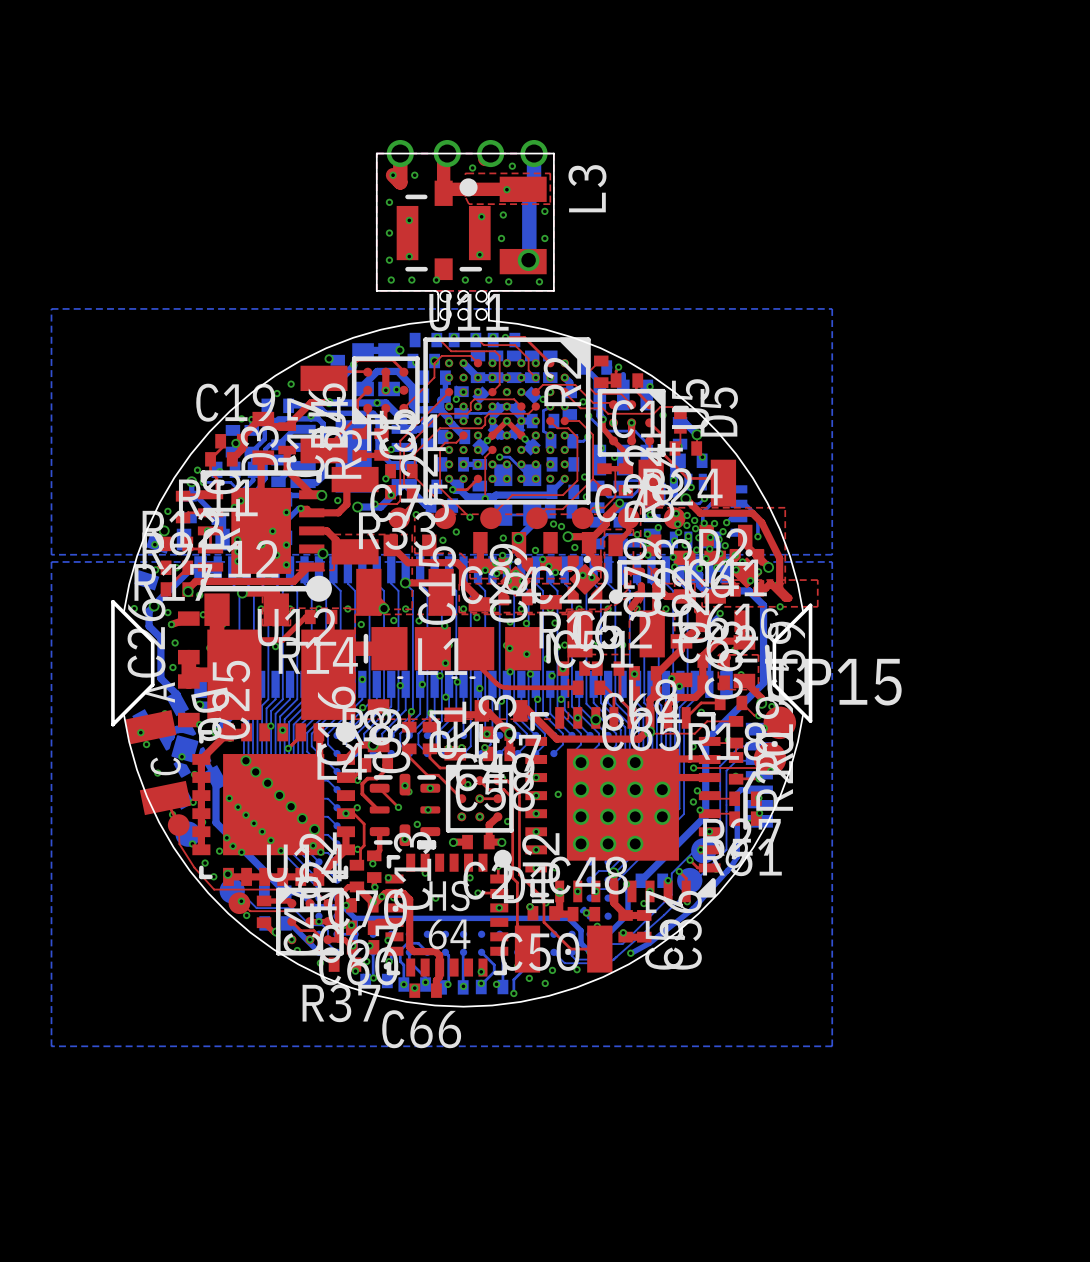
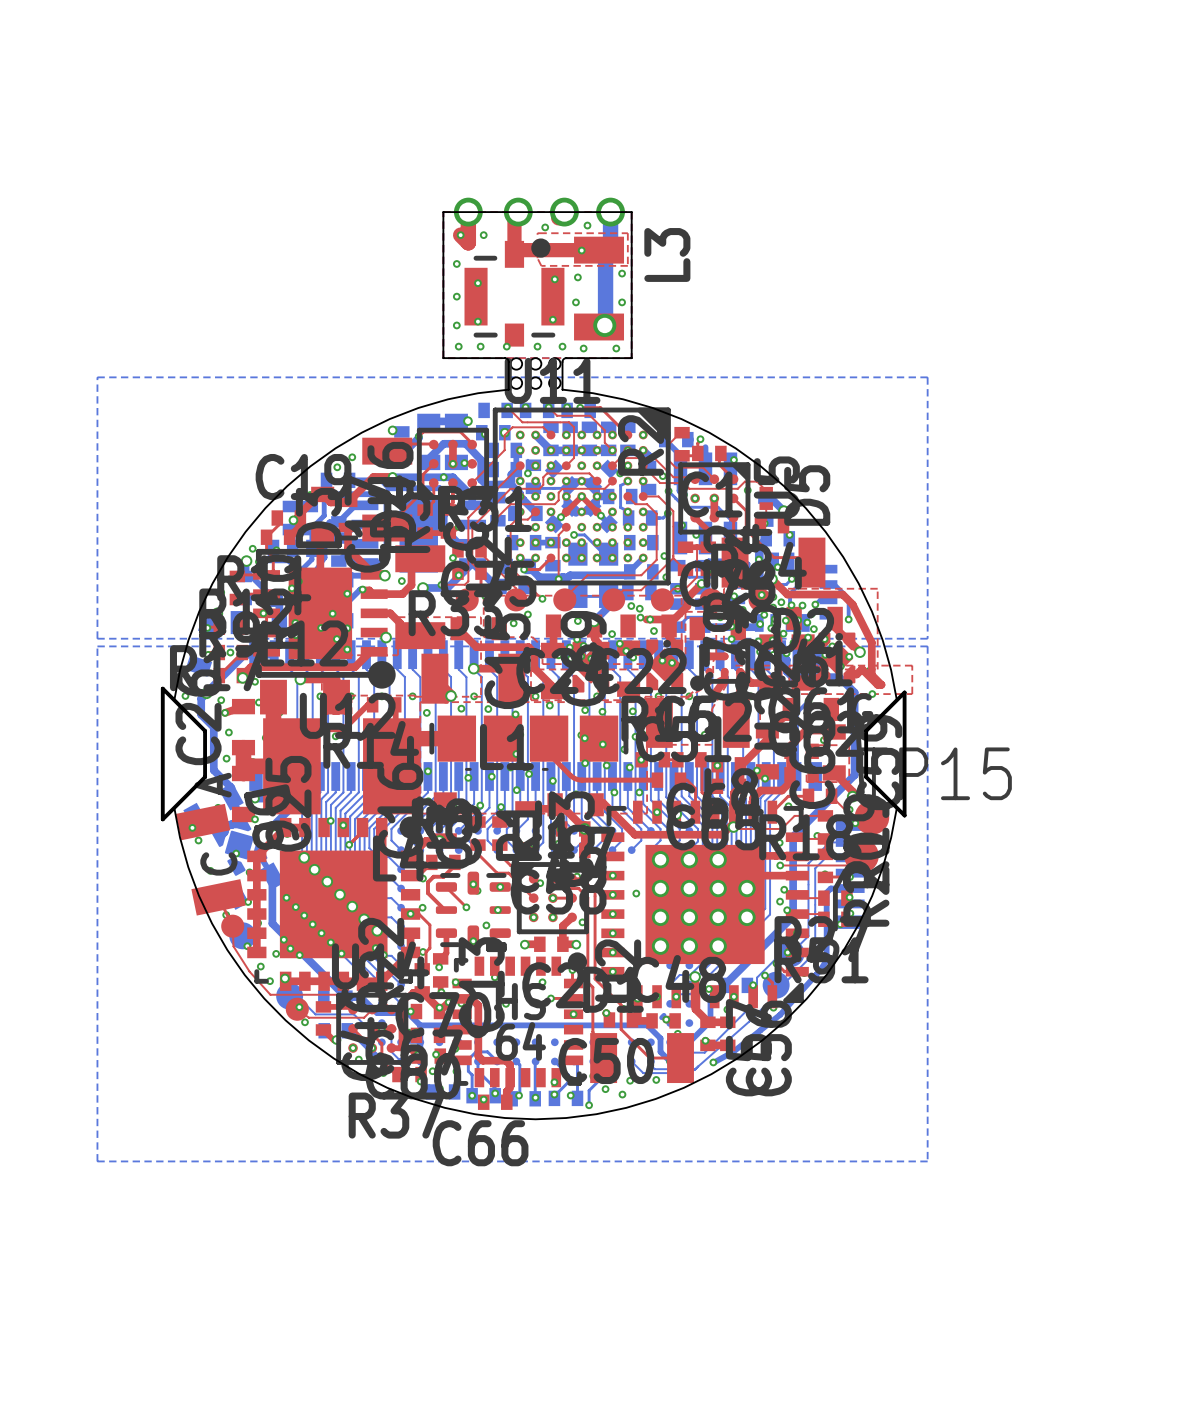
via: none -> (640, 617)
via: (568, 536) -> none
via: none -> (650, 619)

